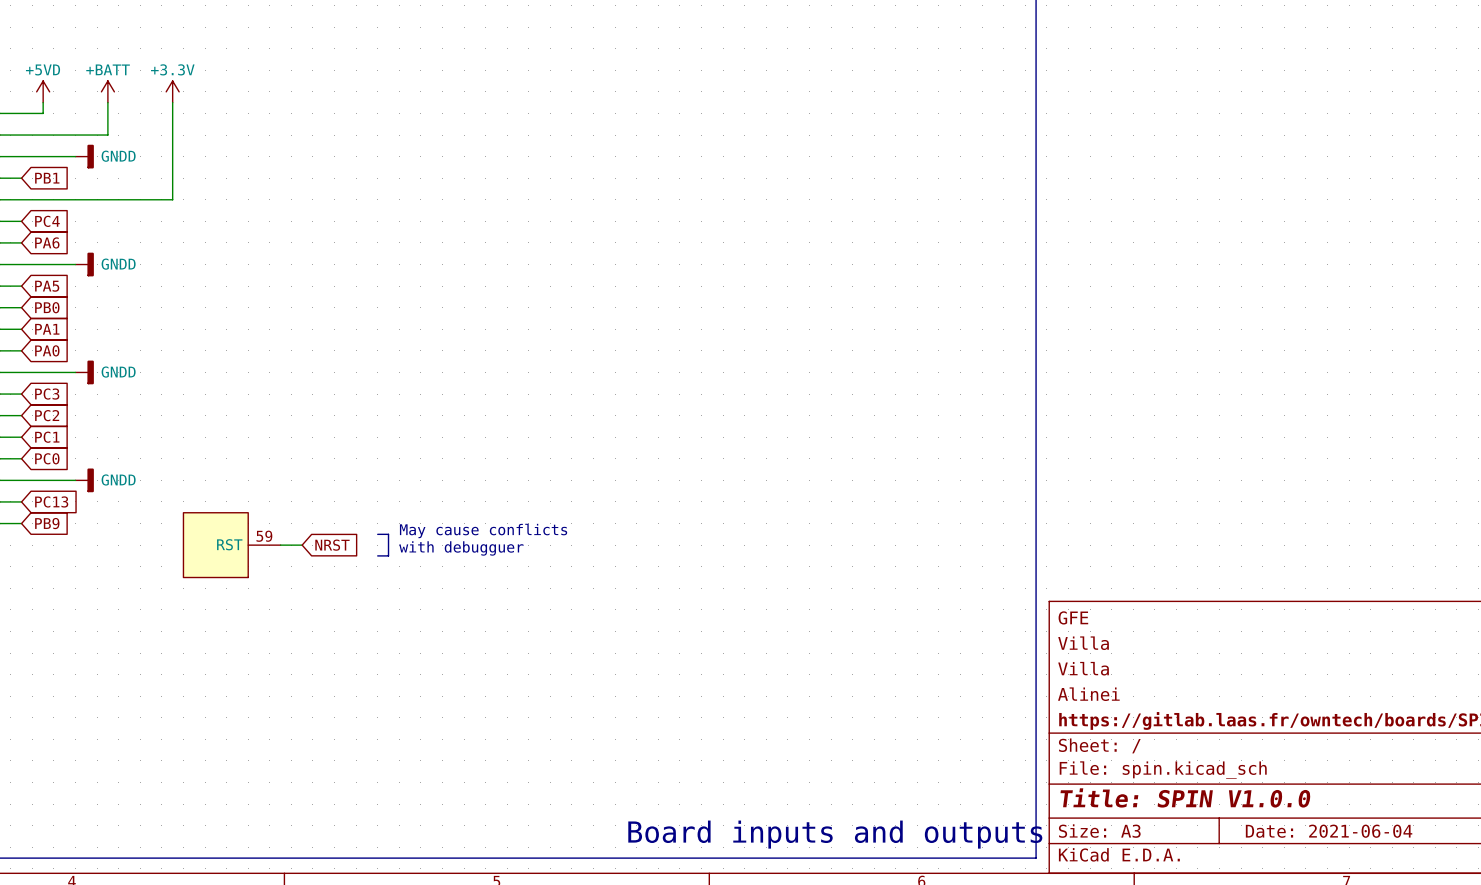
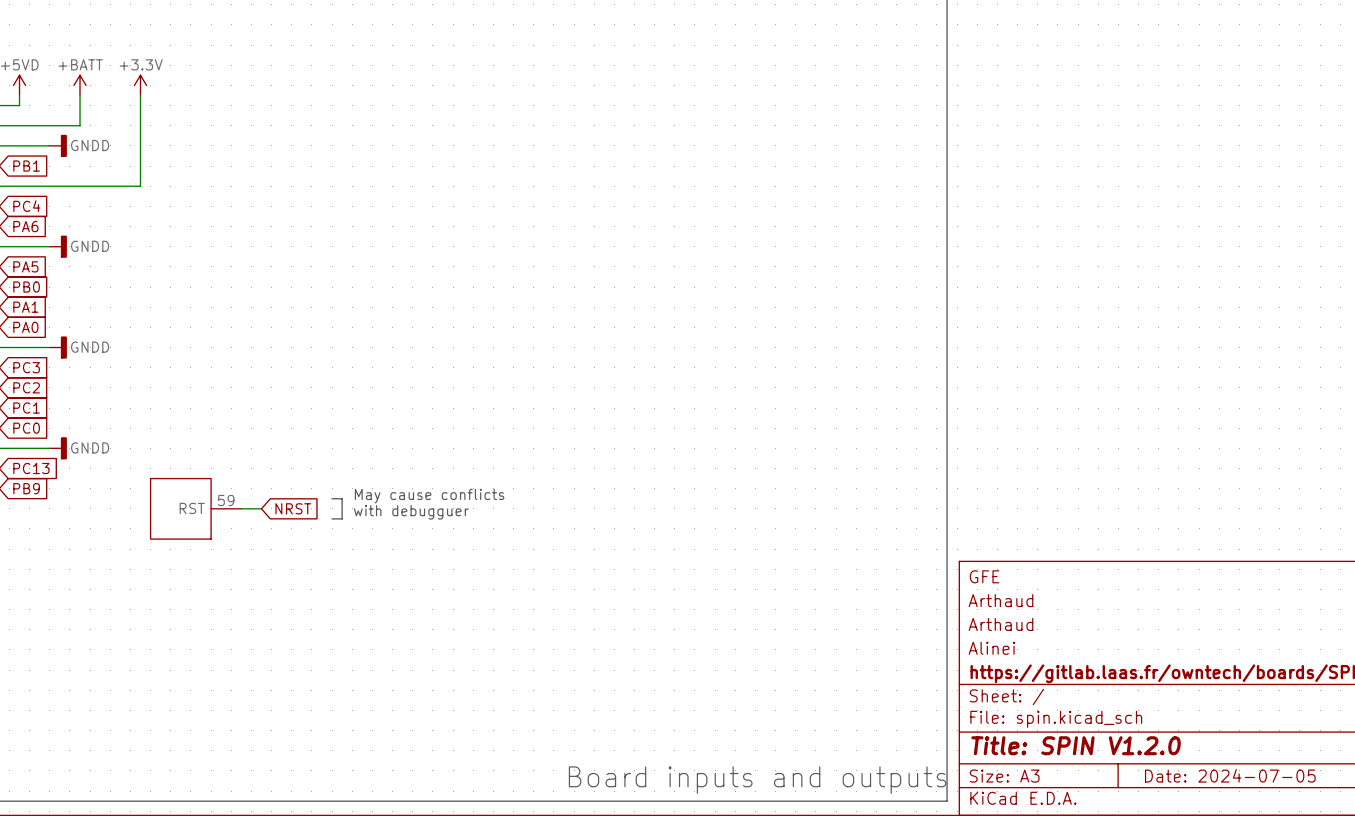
title block: Villa (1083, 643) -> Arthaud (1000, 600)
title block: Villa (1083, 668) -> Arthaud (1000, 624)
title block: Title: SPIN V1.0.0 (1185, 797) -> Title: SPIN V1.2.0 (1076, 745)
title block: Date: 2021-06-04 (1329, 831) -> Date: 2024-07-05 (1230, 775)

